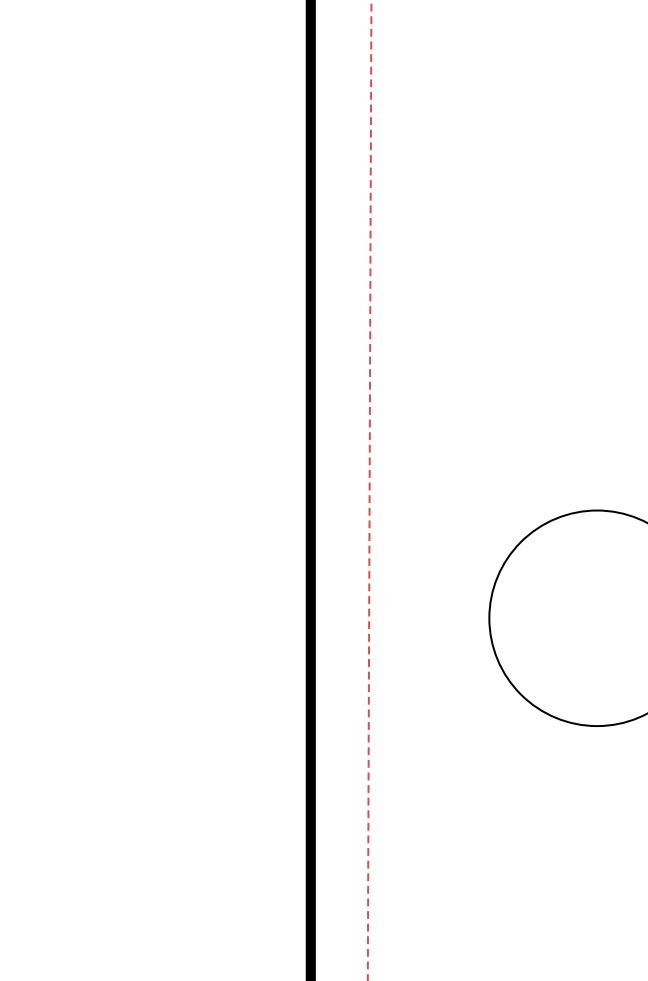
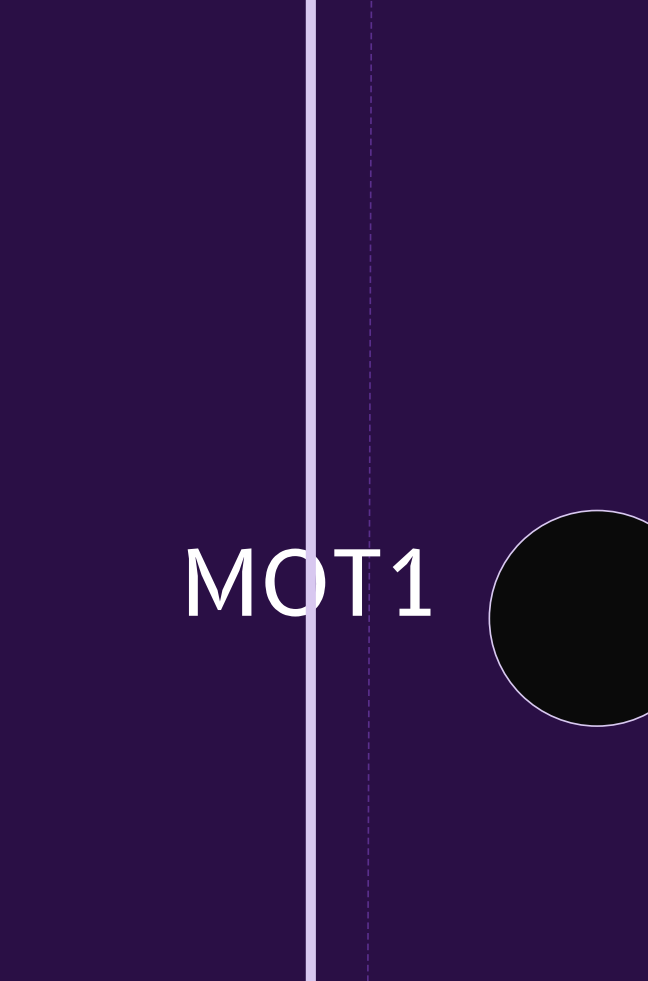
MOT1: none -> (309, 582)

